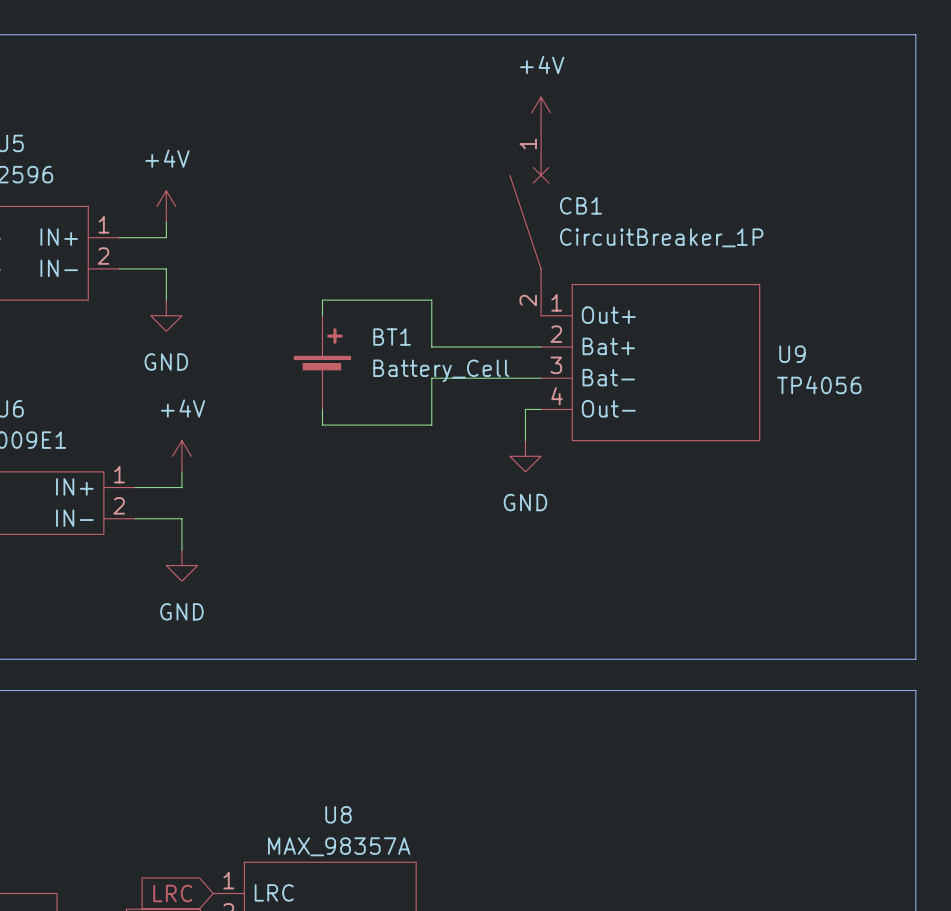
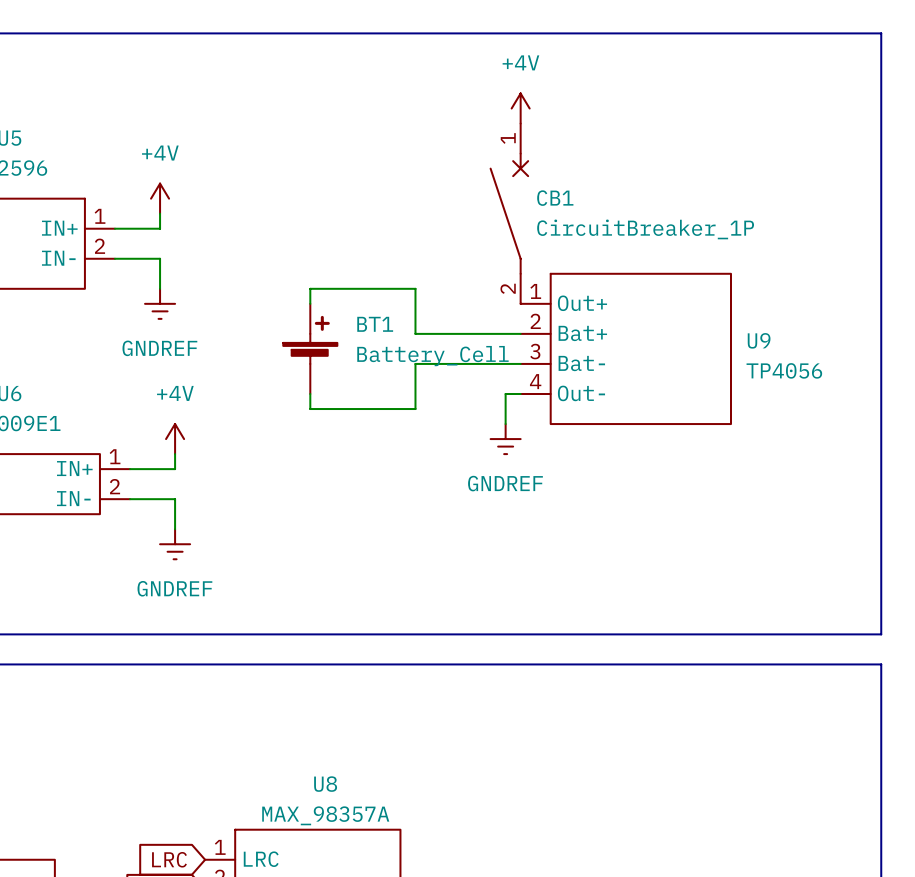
power symbol: GND (166, 315) -> GNDREF (160, 303)
power symbol: GND (525, 456) -> GNDREF (505, 439)
power symbol: GND (181, 565) -> GNDREF (175, 544)

